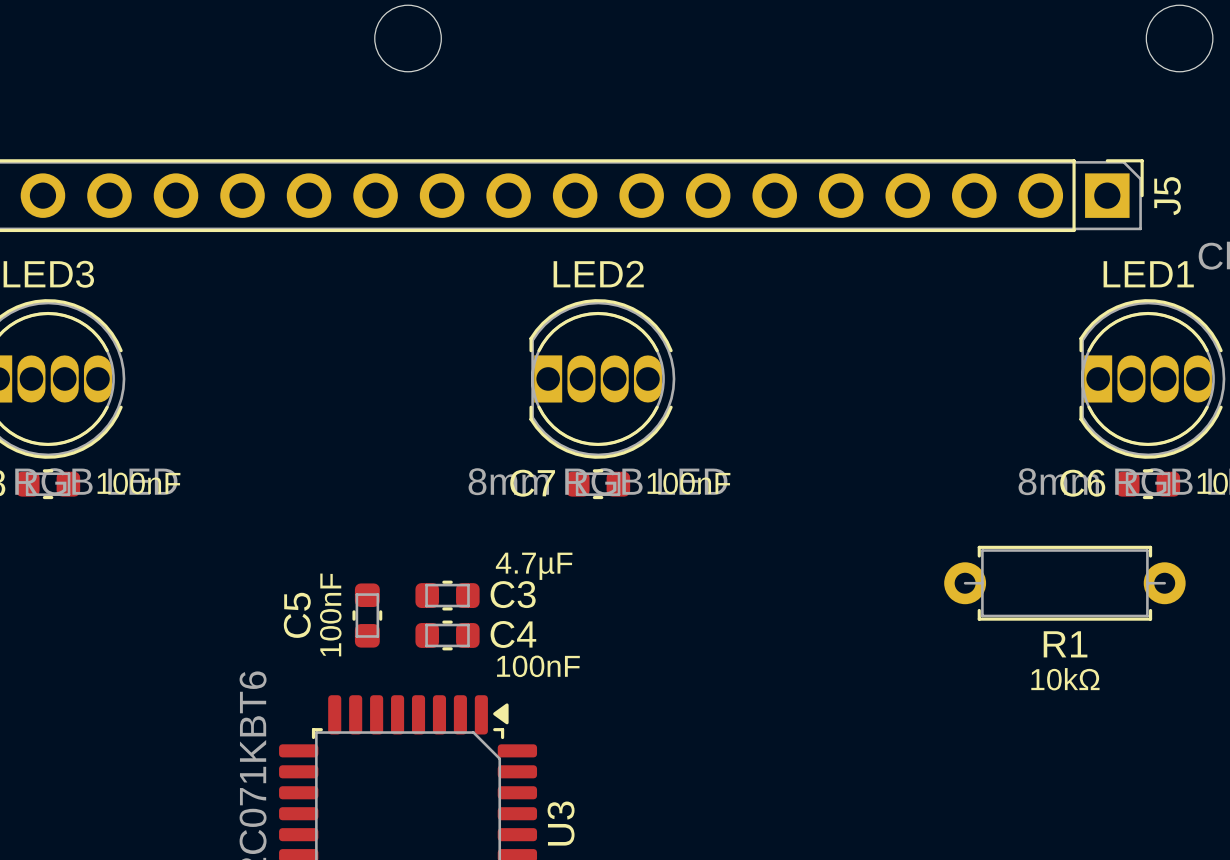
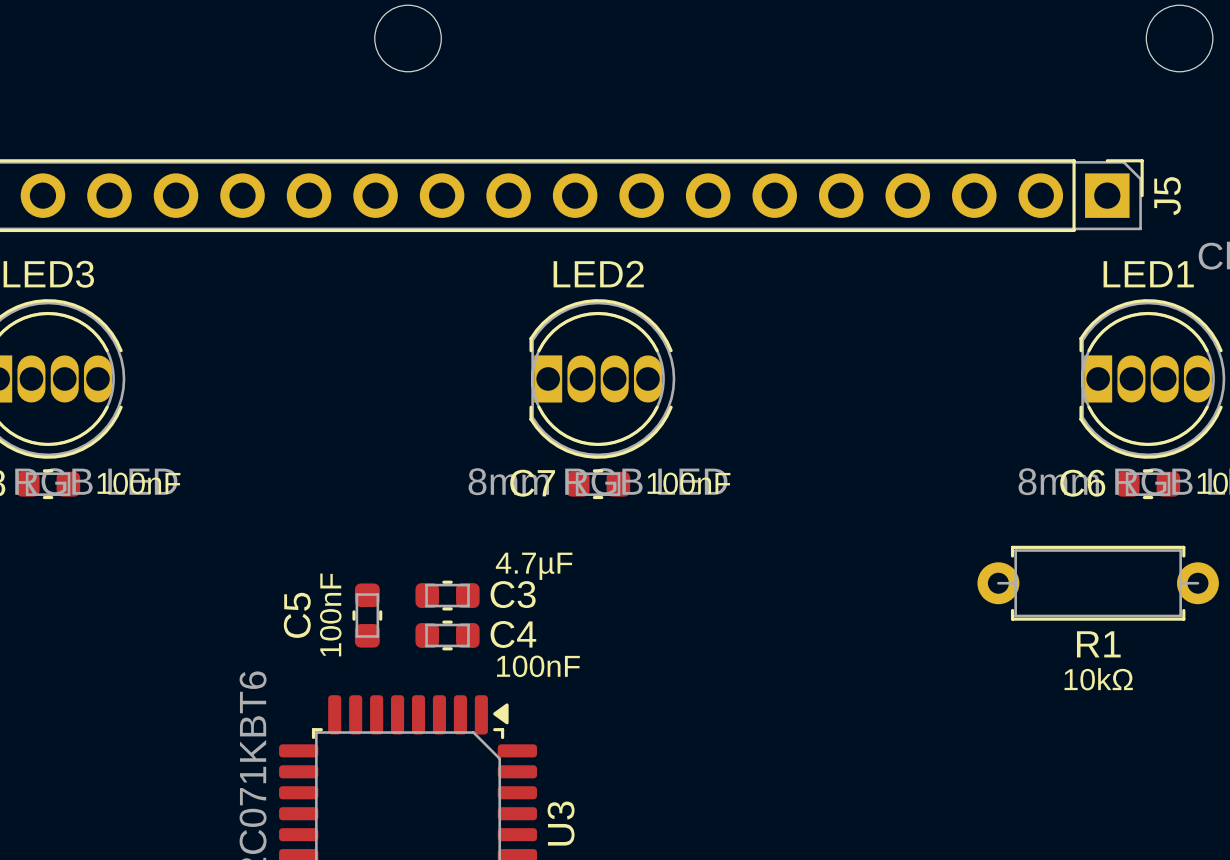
R1 position: (1064, 583) -> (1098, 583)

